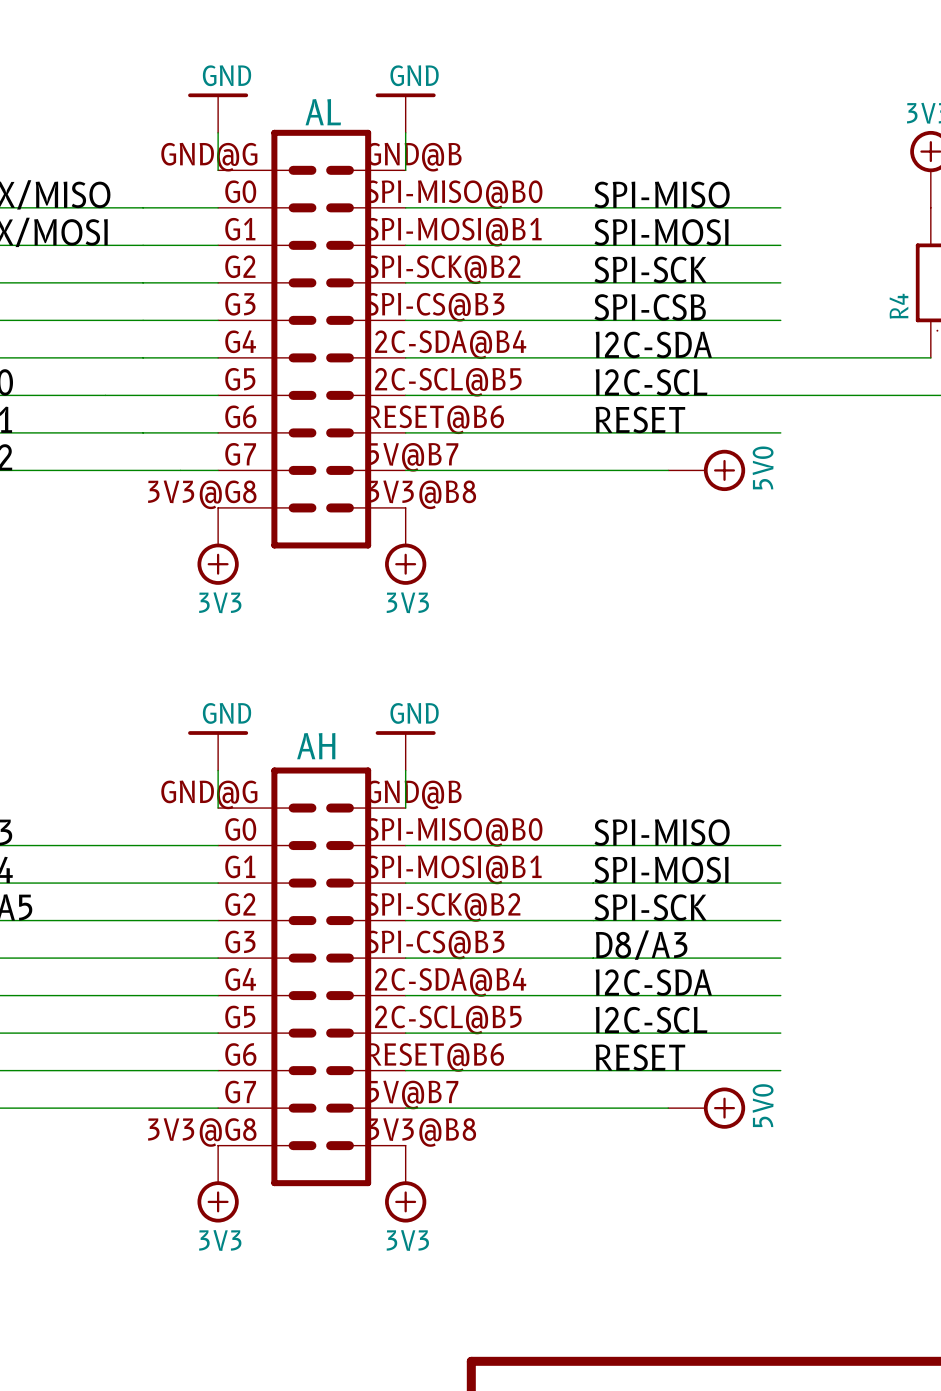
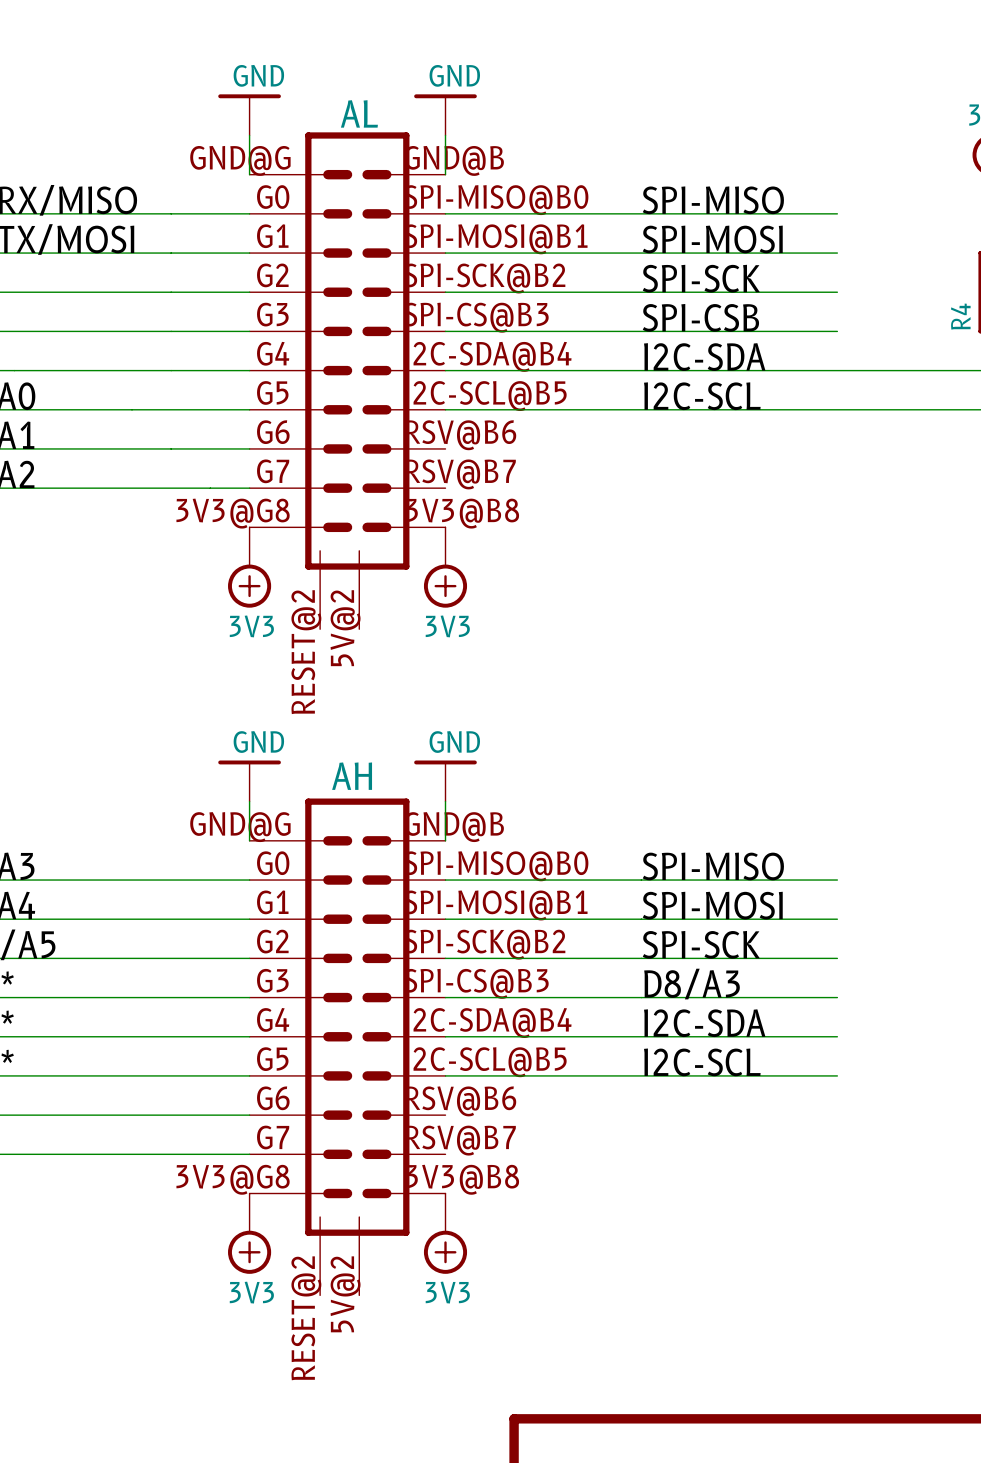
AL: (311, 339) -> none
AL: none -> (347, 380)
label: RESET (640, 419) -> none
wire: (405, 432) (780, 432) -> none
wire: (405, 470) (668, 470) -> none
power symbol: 5V0 (706, 470) -> none
AH: (311, 976) -> none
AH: none -> (347, 1046)
label: RESET (640, 1057) -> none
wire: (405, 1070) (780, 1070) -> none
wire: (405, 1108) (668, 1108) -> none
power symbol: 5V0 (706, 1108) -> none

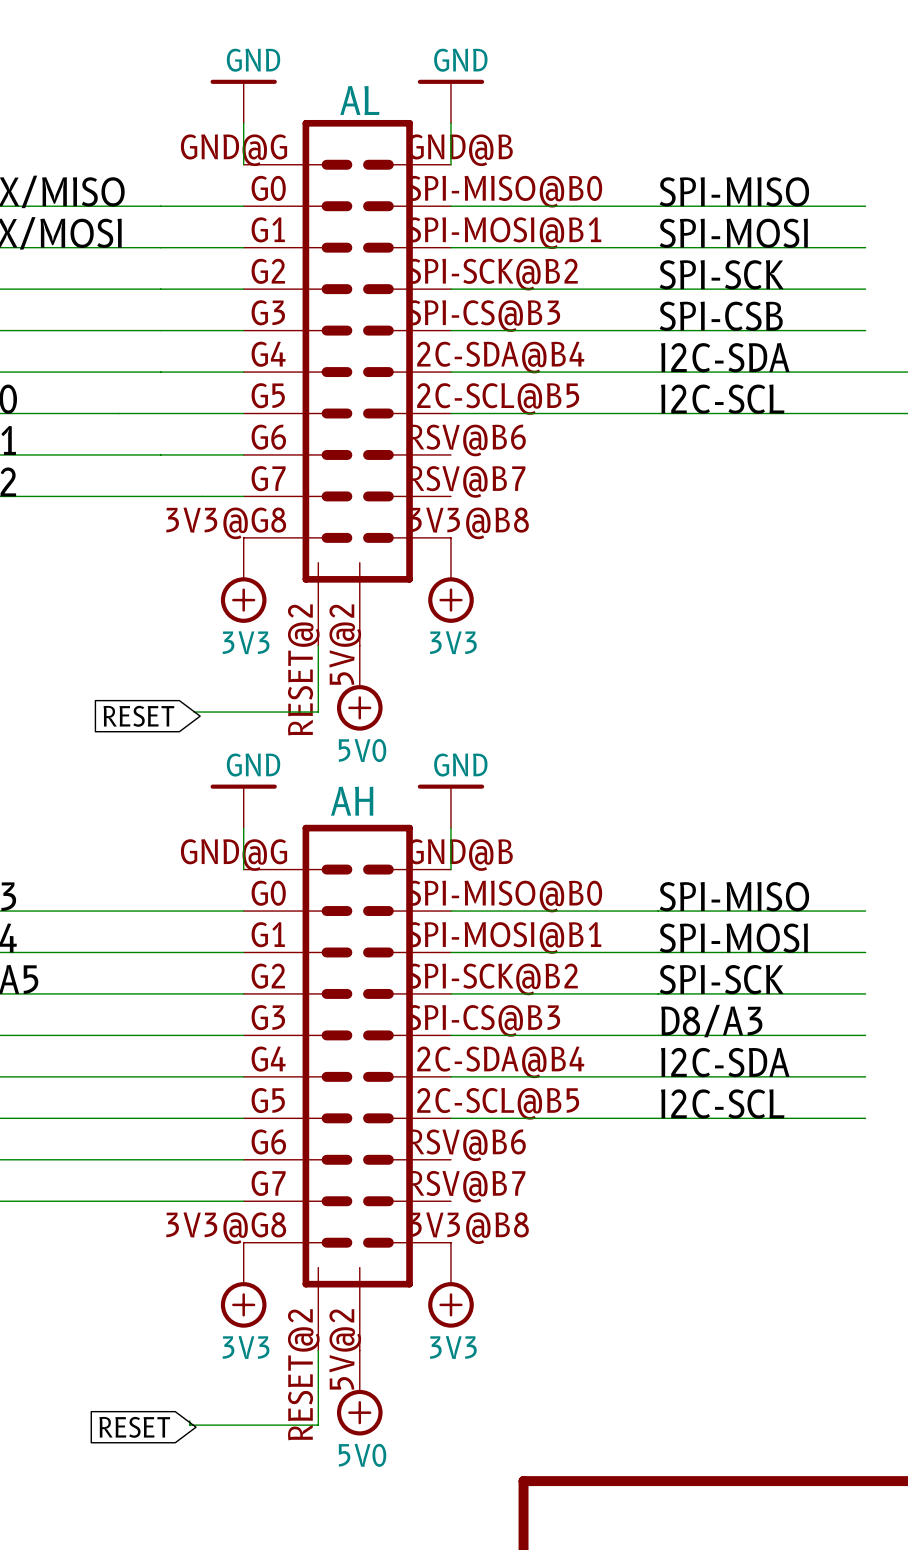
wire: none -> (318, 645) (318, 712) (193, 712)
power symbol: none -> 5V0 (359, 688)
global label: none -> RESET (138, 716)
wire: none -> (318, 1350) (318, 1425) (189, 1425) (189, 1420)
power symbol: none -> 5V0 (359, 1392)
global label: none -> RESET (134, 1427)

